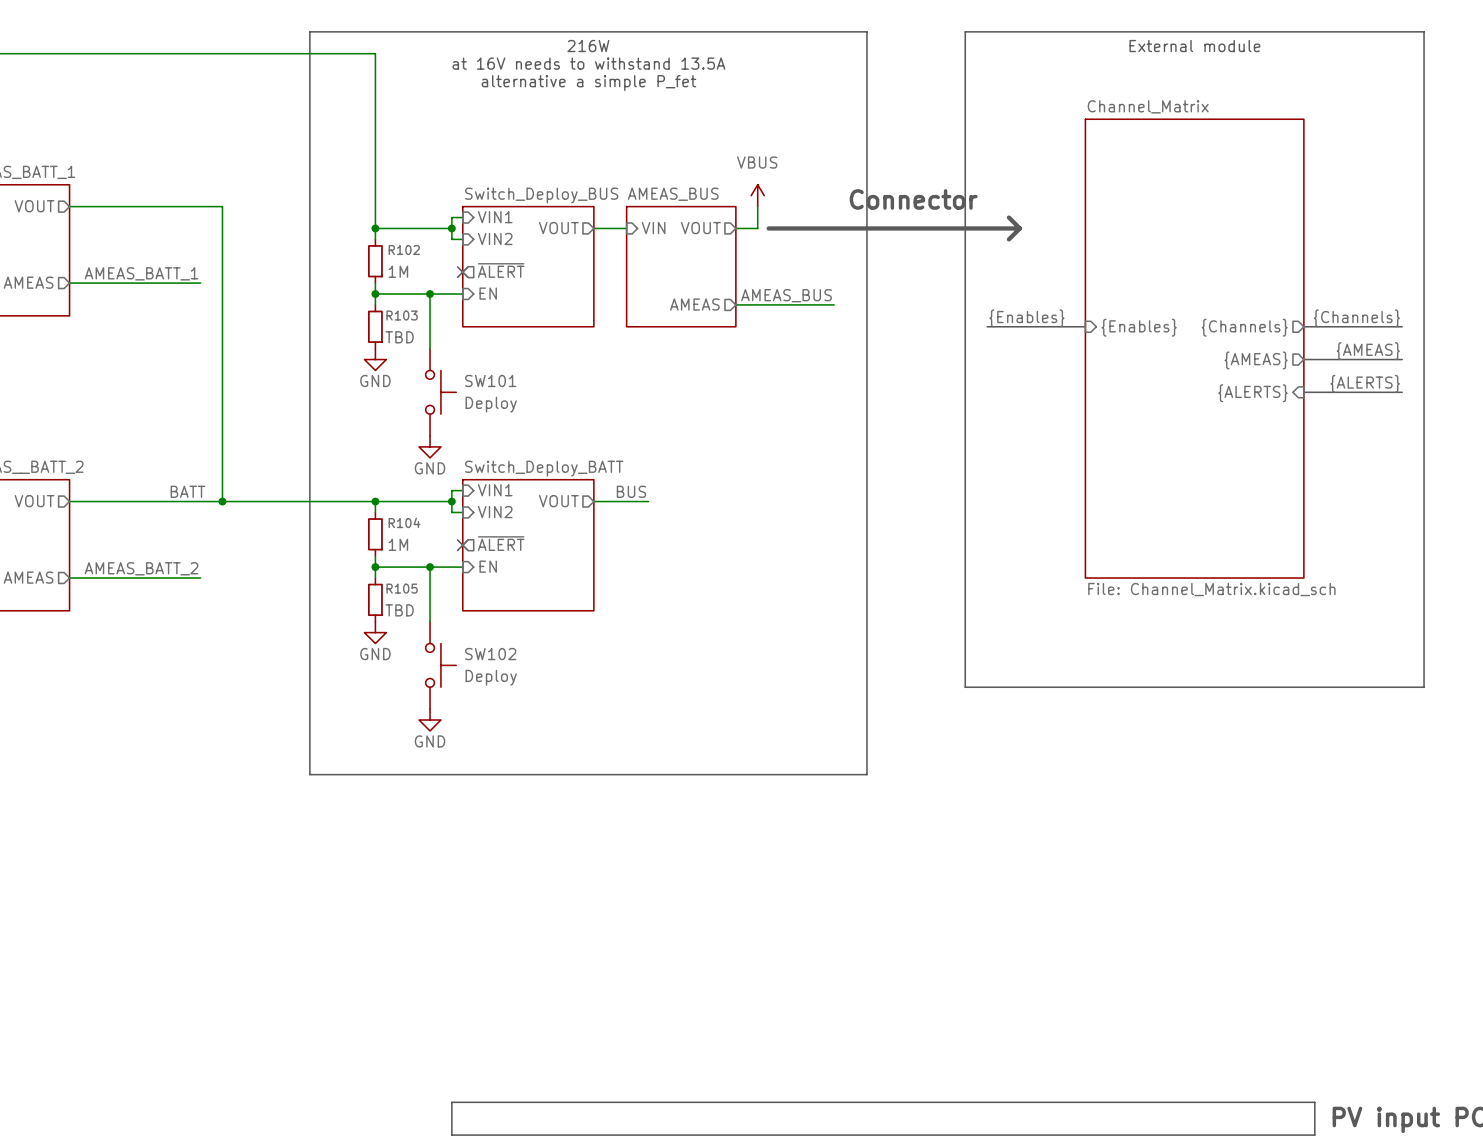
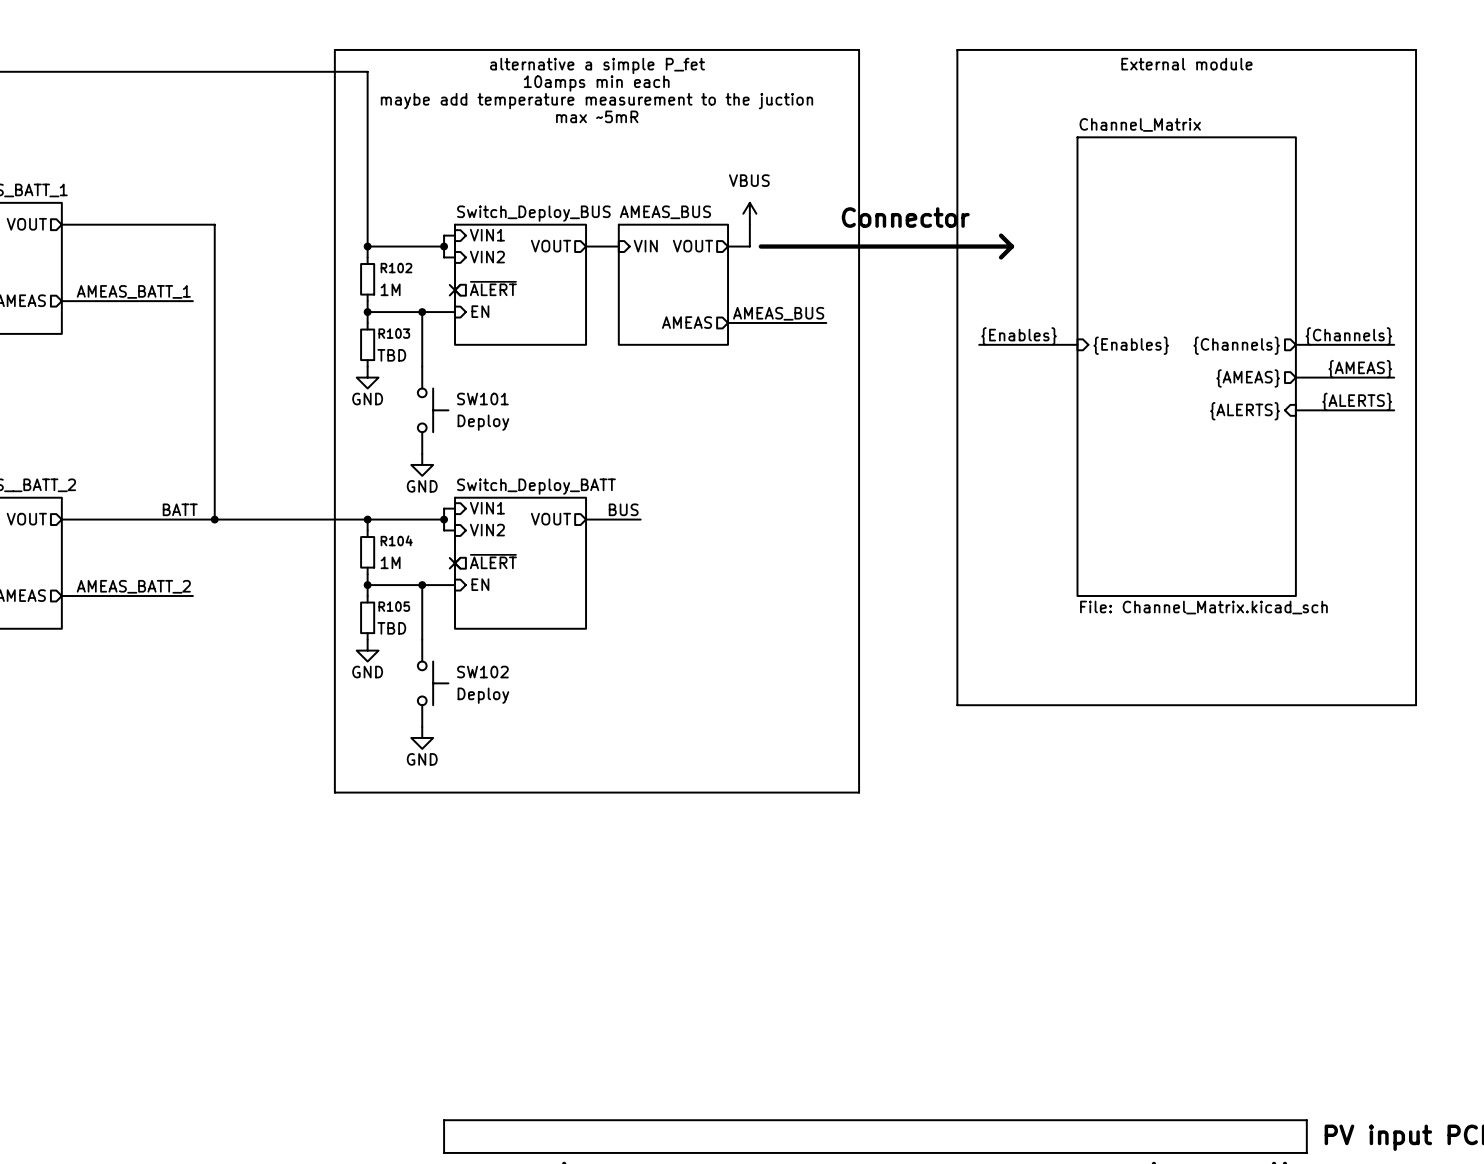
line: (342, 31) (309, 31) (309, 774) (342, 774) -> (334, 49) (334, 792)
text: 216W (588, 46) -> none
text: at 16V needs to withstand 13.5A (588, 63) -> none
text: none -> 10amps min each (596, 83)
text position: alternative a simple P_fet (588, 83) -> alternative a simple P_fet (597, 65)
text: none -> maybe add temperature measurement to the juction (596, 101)
text: none -> max ~5mR (597, 116)

